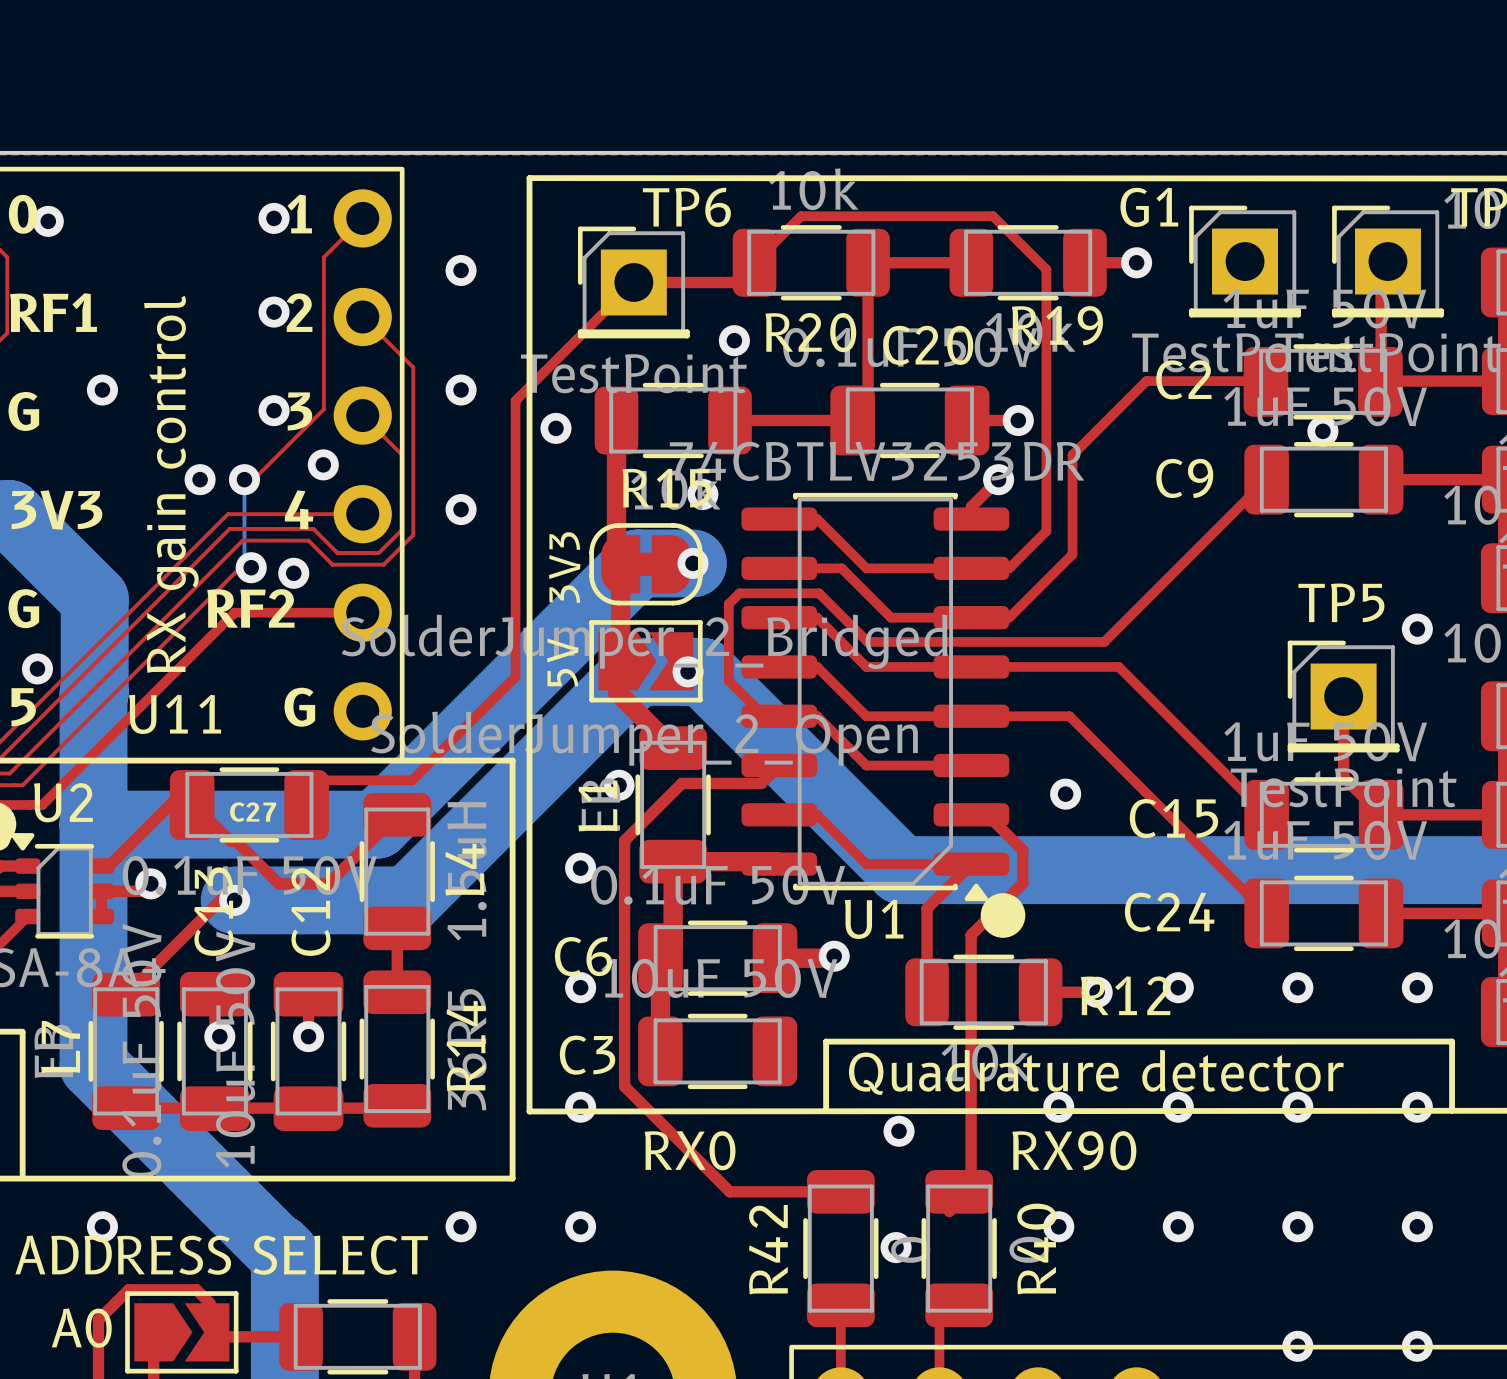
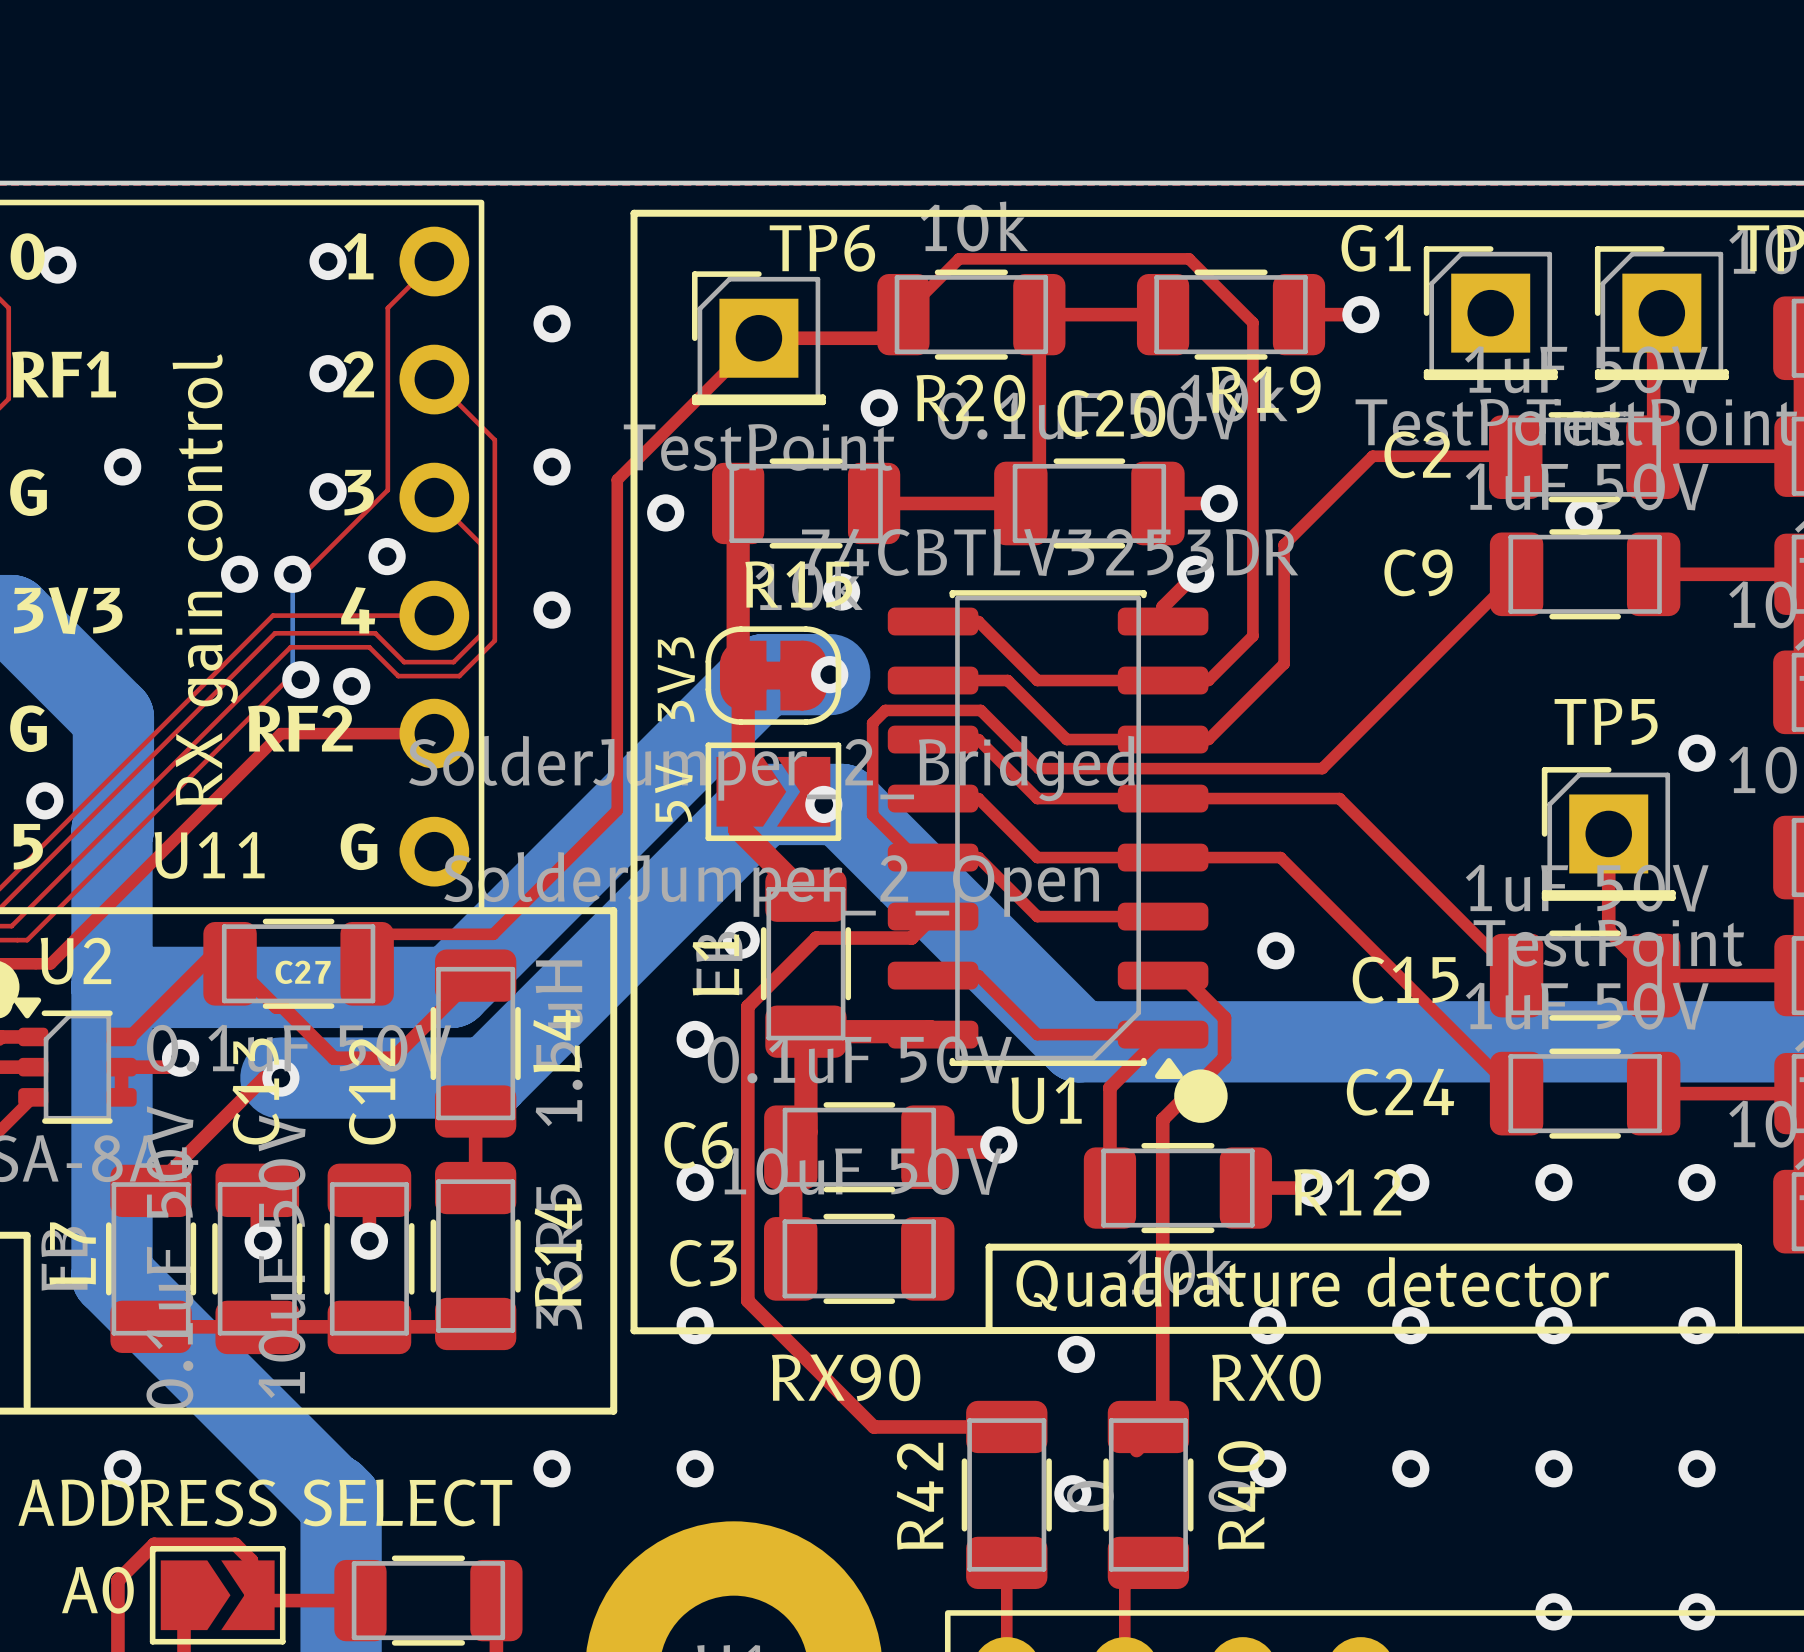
text: RX0 (690, 1150) -> RX90 (846, 1377)
text: RX90 (1074, 1150) -> RX0 (1266, 1377)

